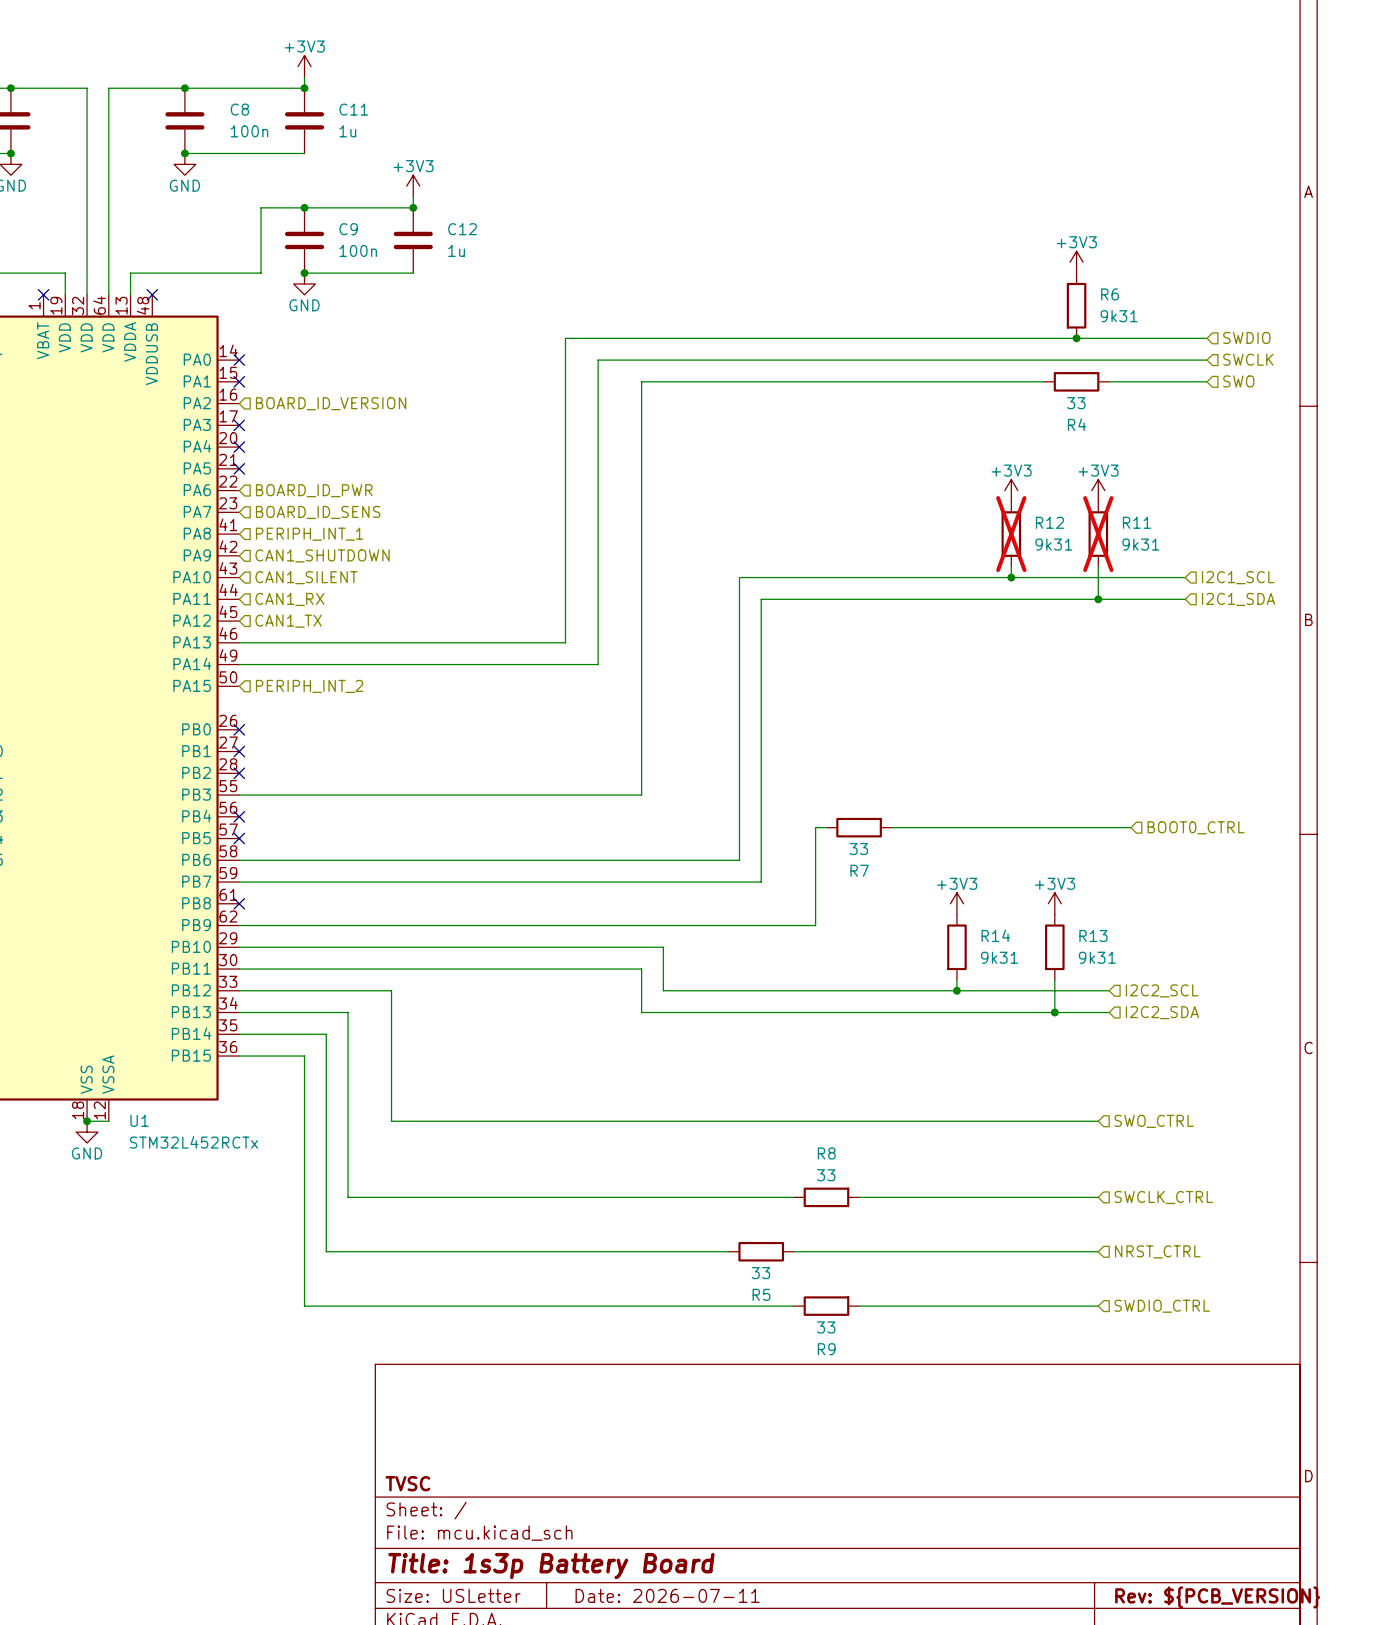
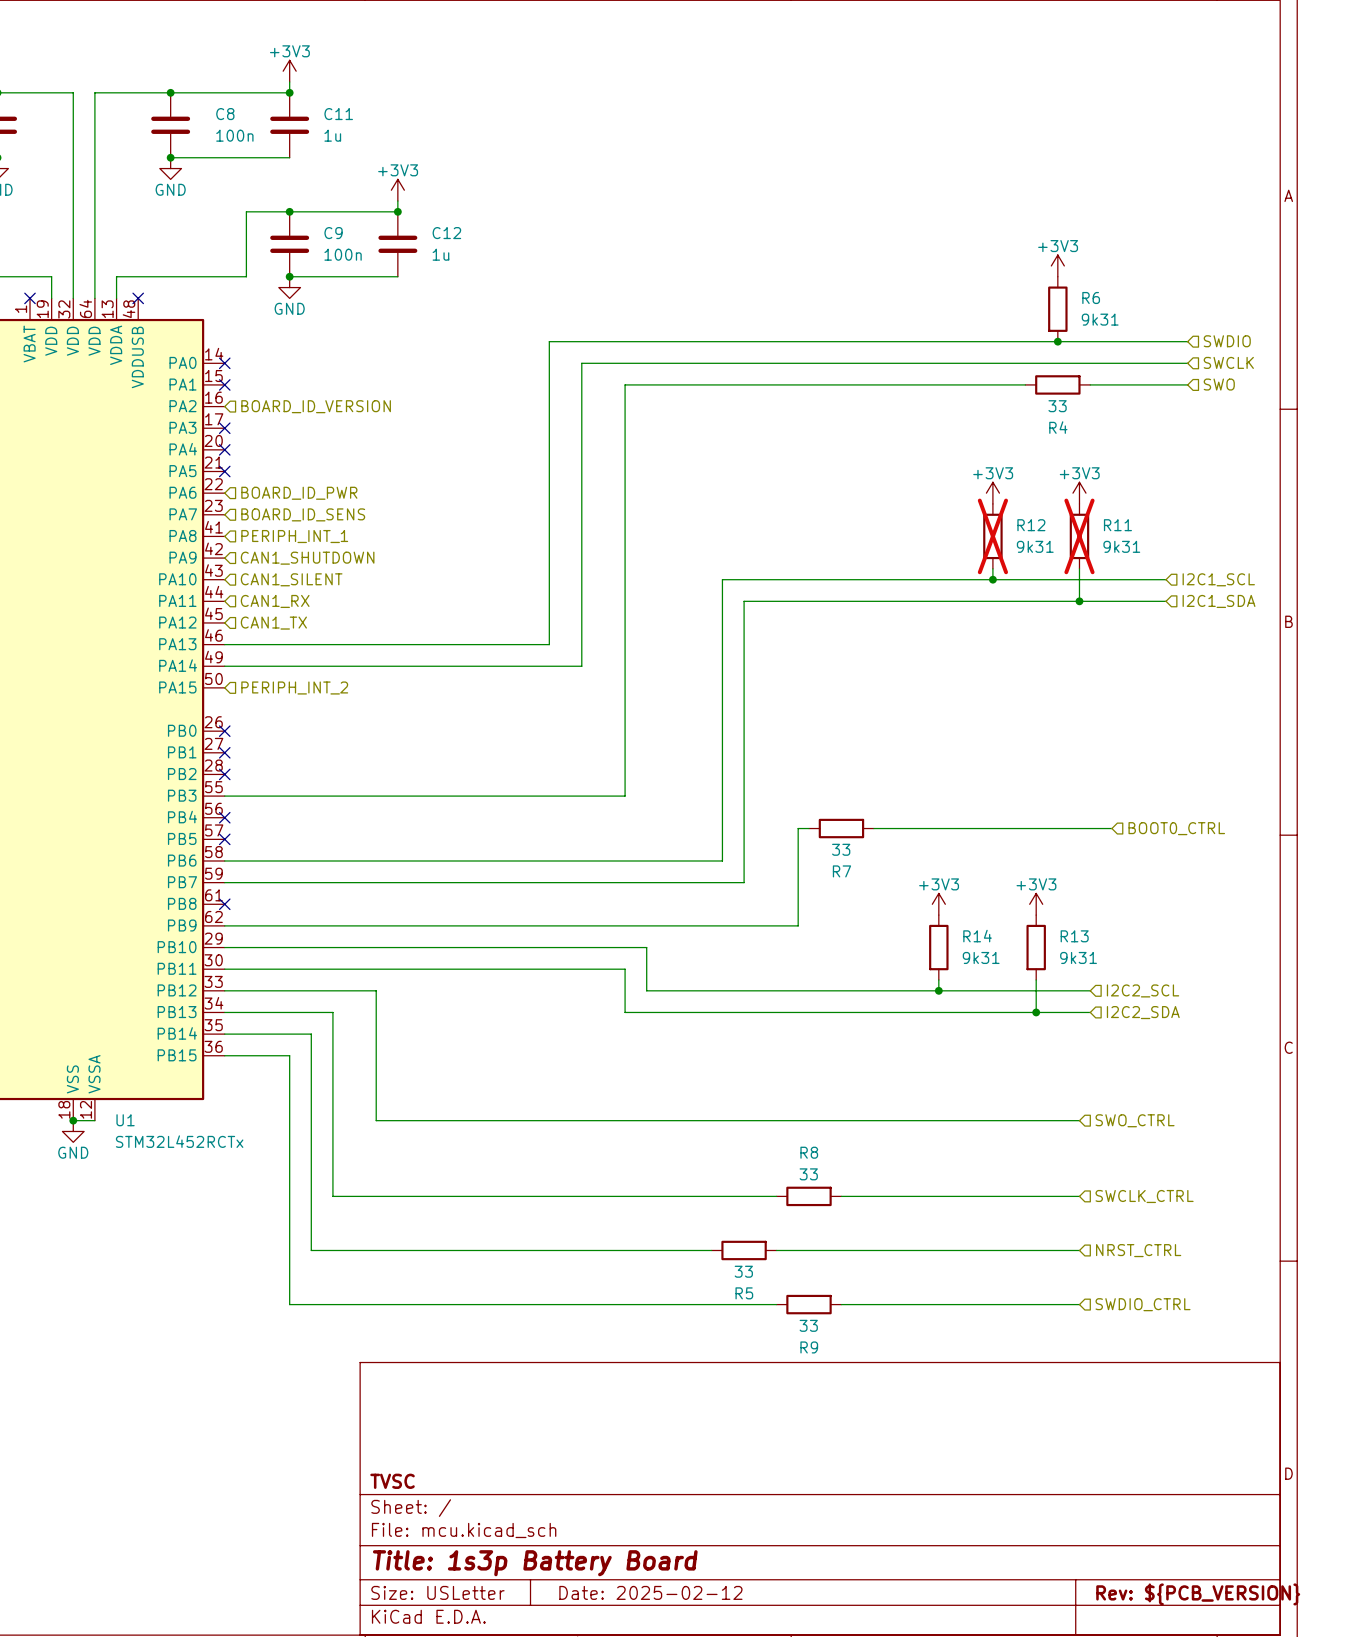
title block: Date: 2026-07-11 (667, 1595) -> Date: 2025-02-12 (650, 1592)

